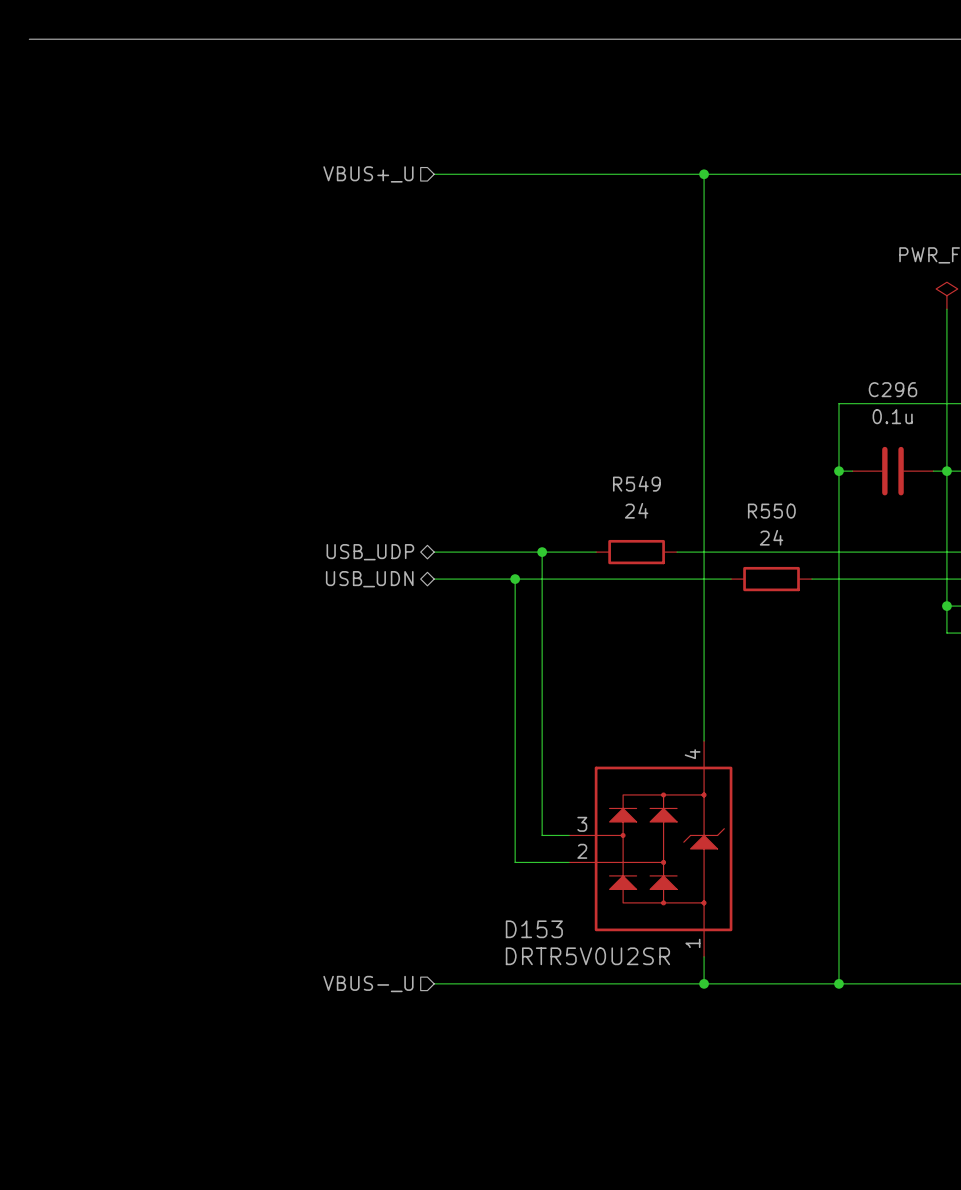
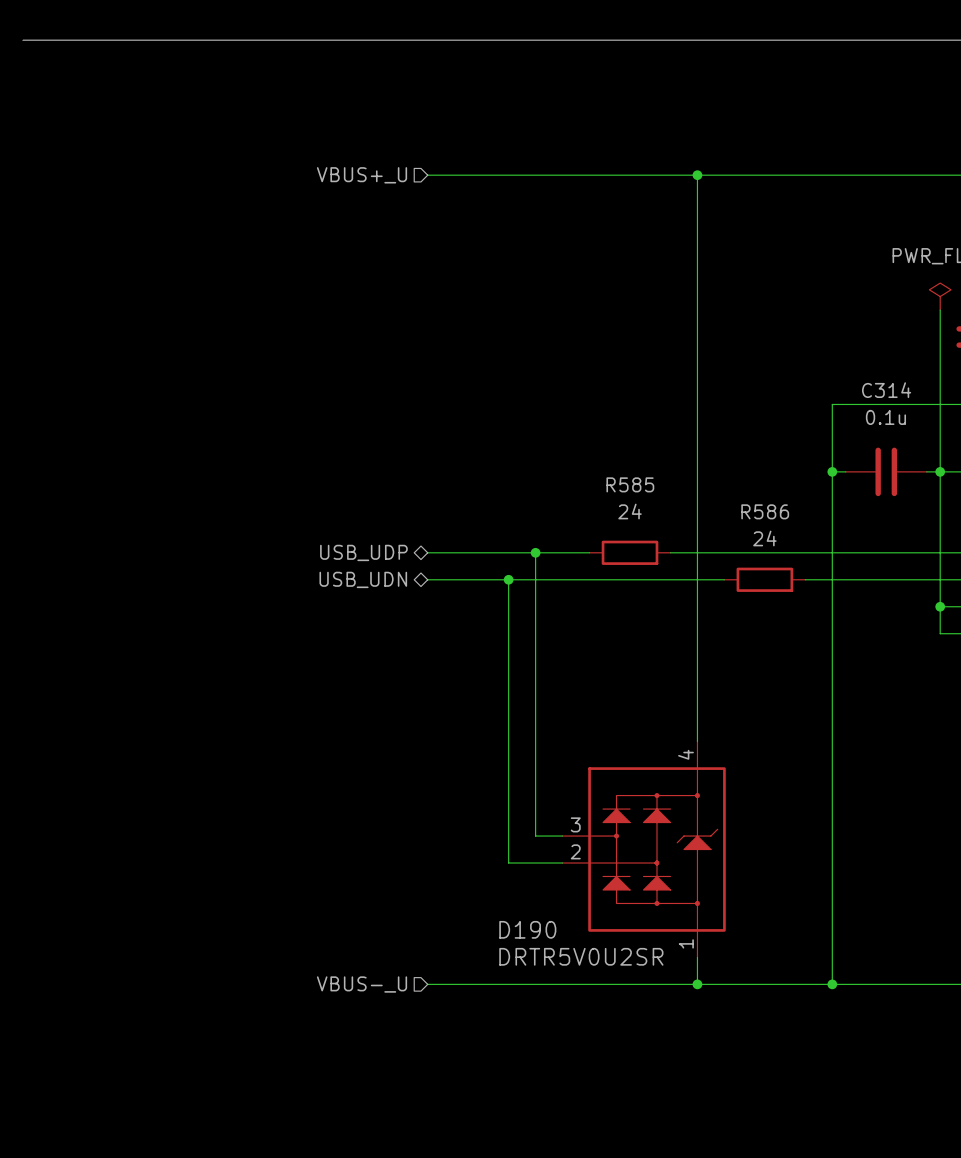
C296 name: C296 (892, 389) -> C314 (886, 390)
R549 name: R549 (636, 483) -> R585 (630, 484)
R550 name: R550 (771, 511) -> R586 (765, 511)
D153 name: D153 (534, 929) -> D190 (527, 929)

